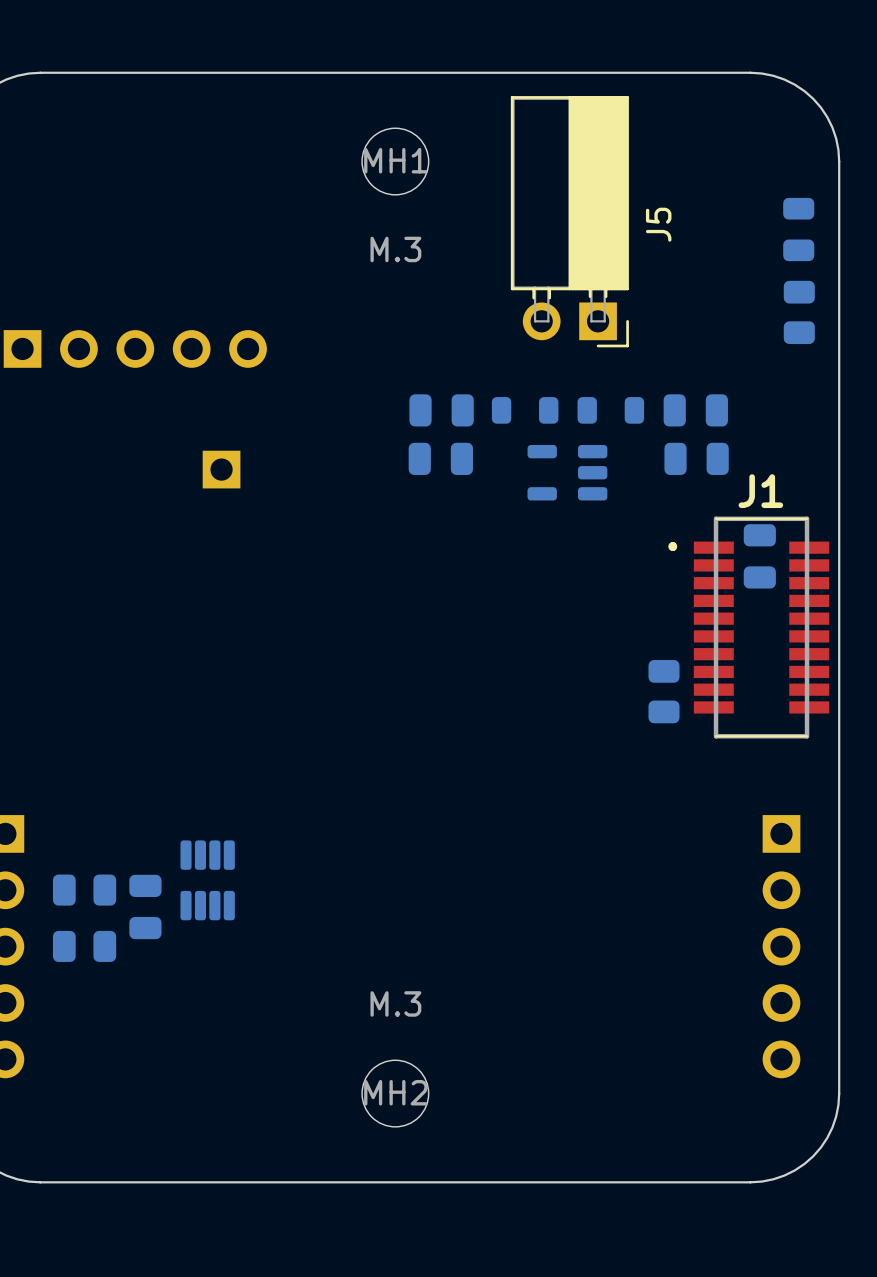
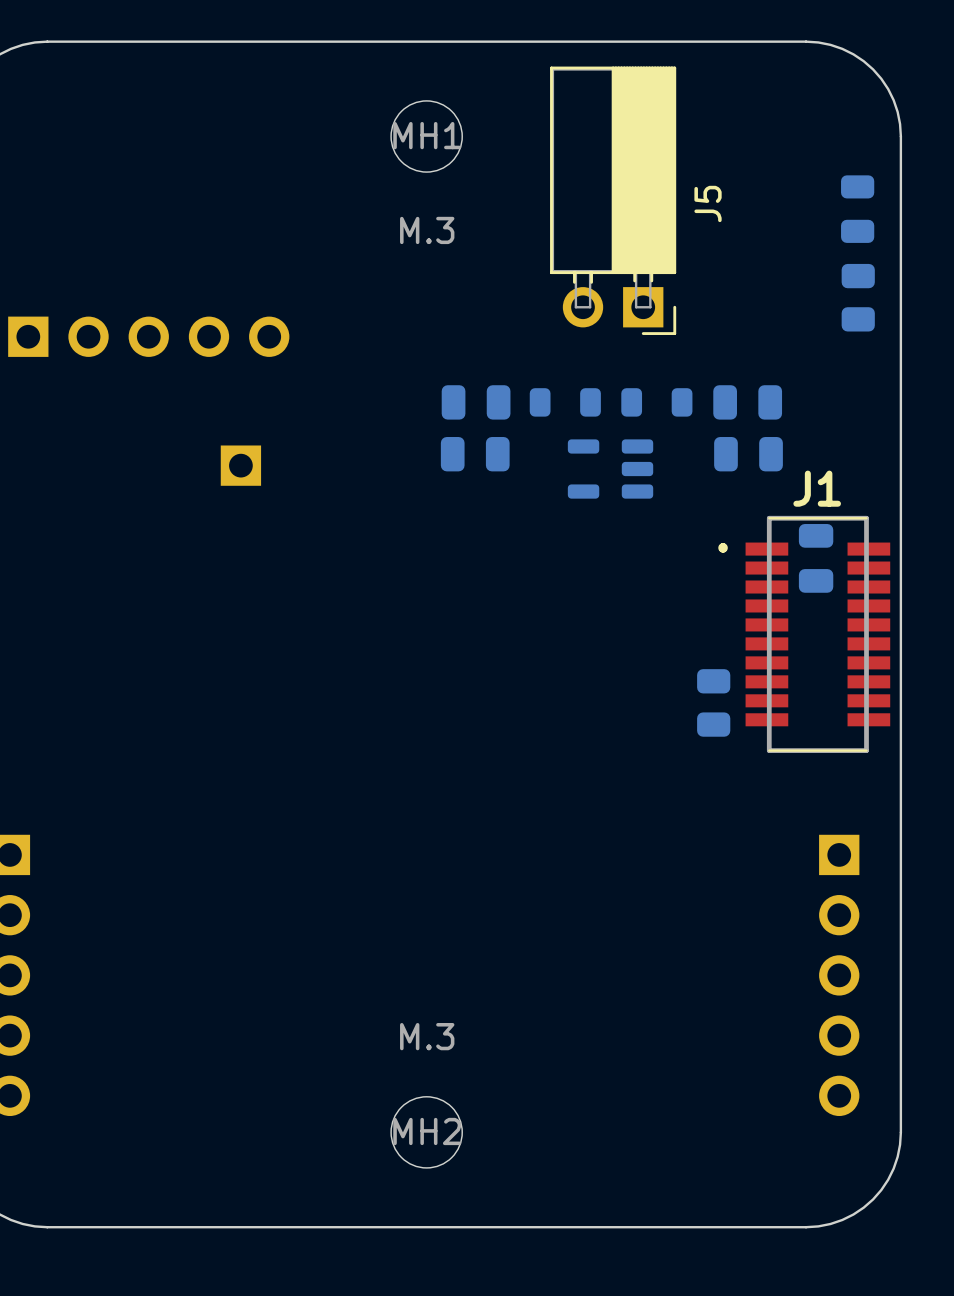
part: (207, 880) -> none
part: (84, 890) -> none
part: (145, 906) -> none
part: (84, 946) -> none

